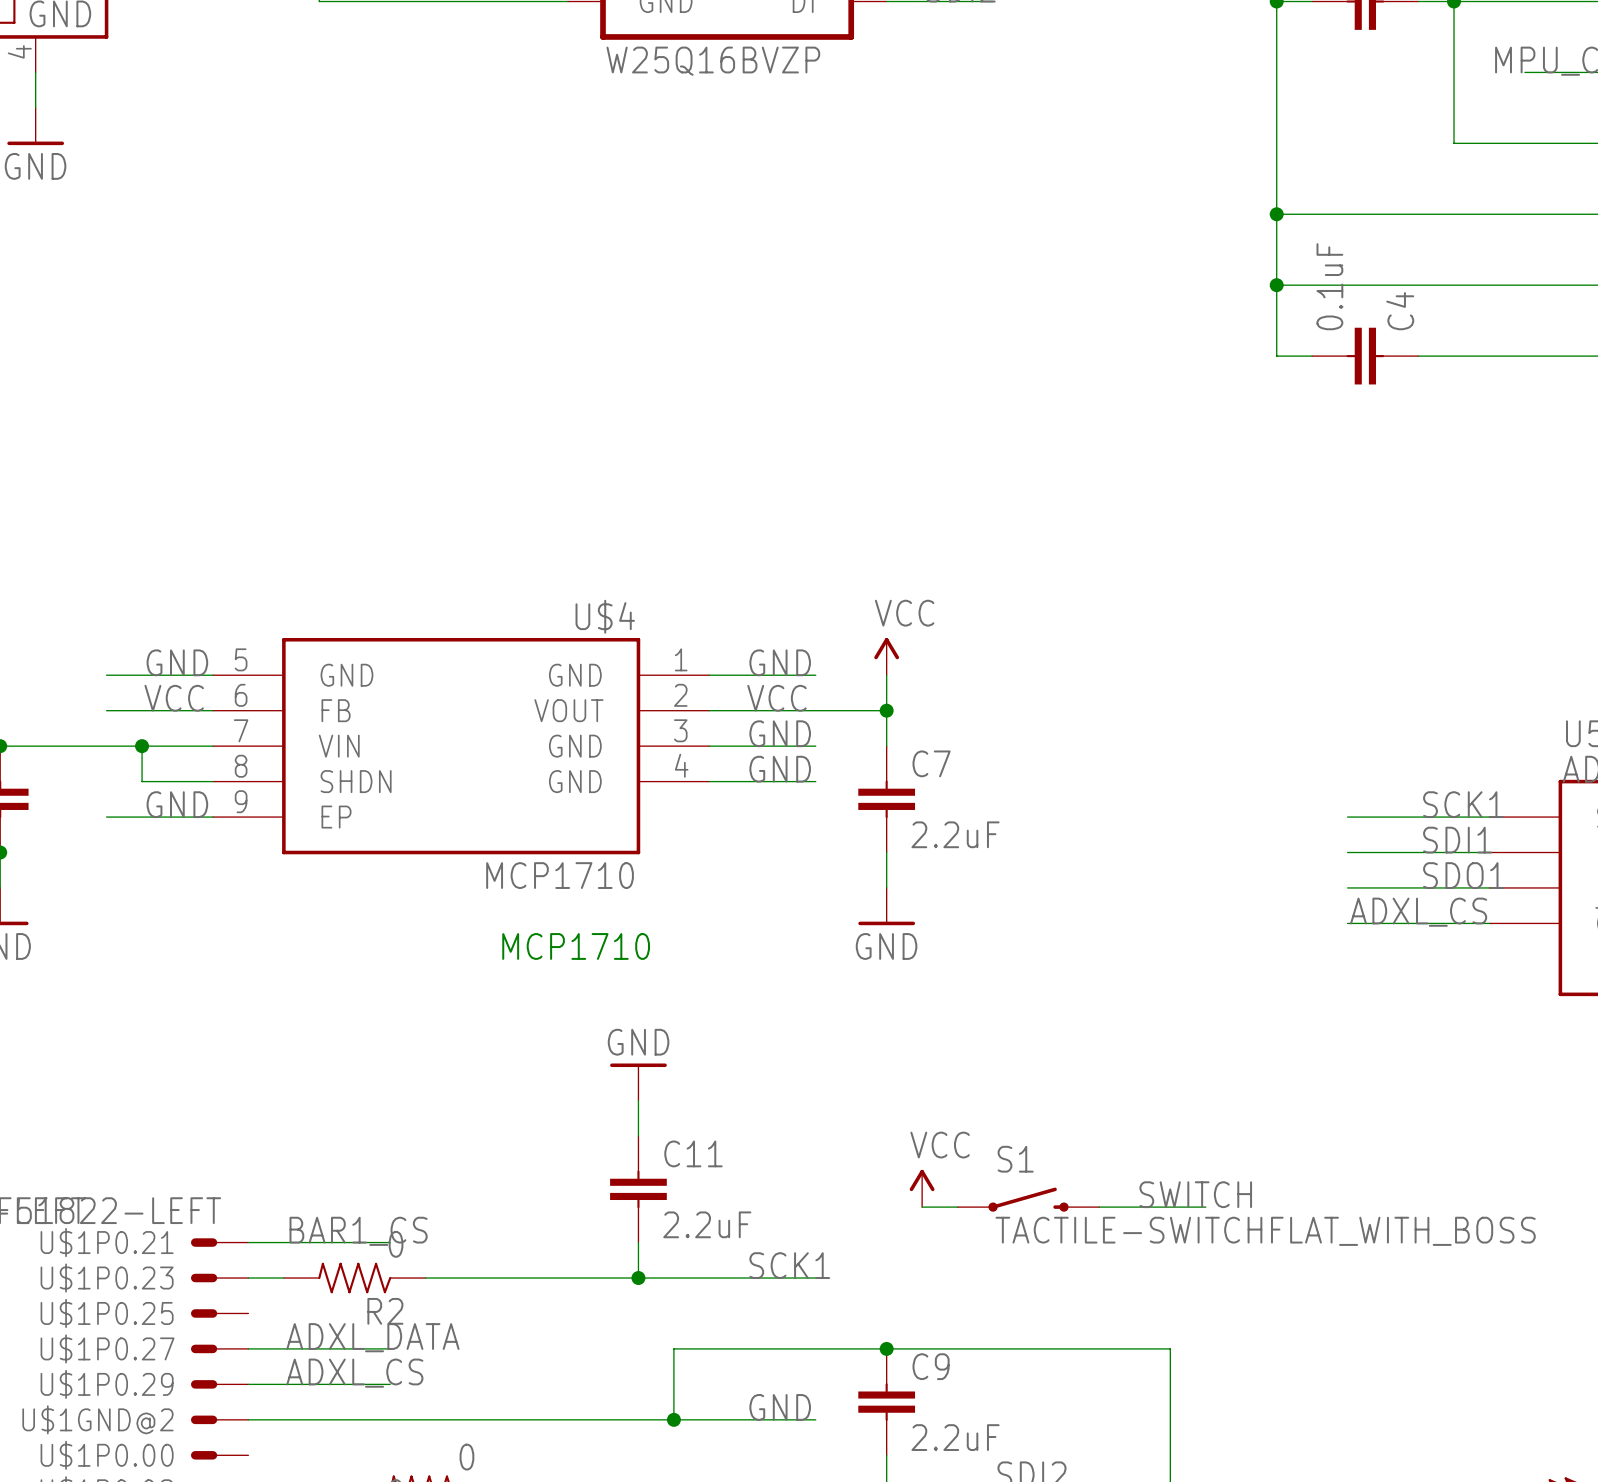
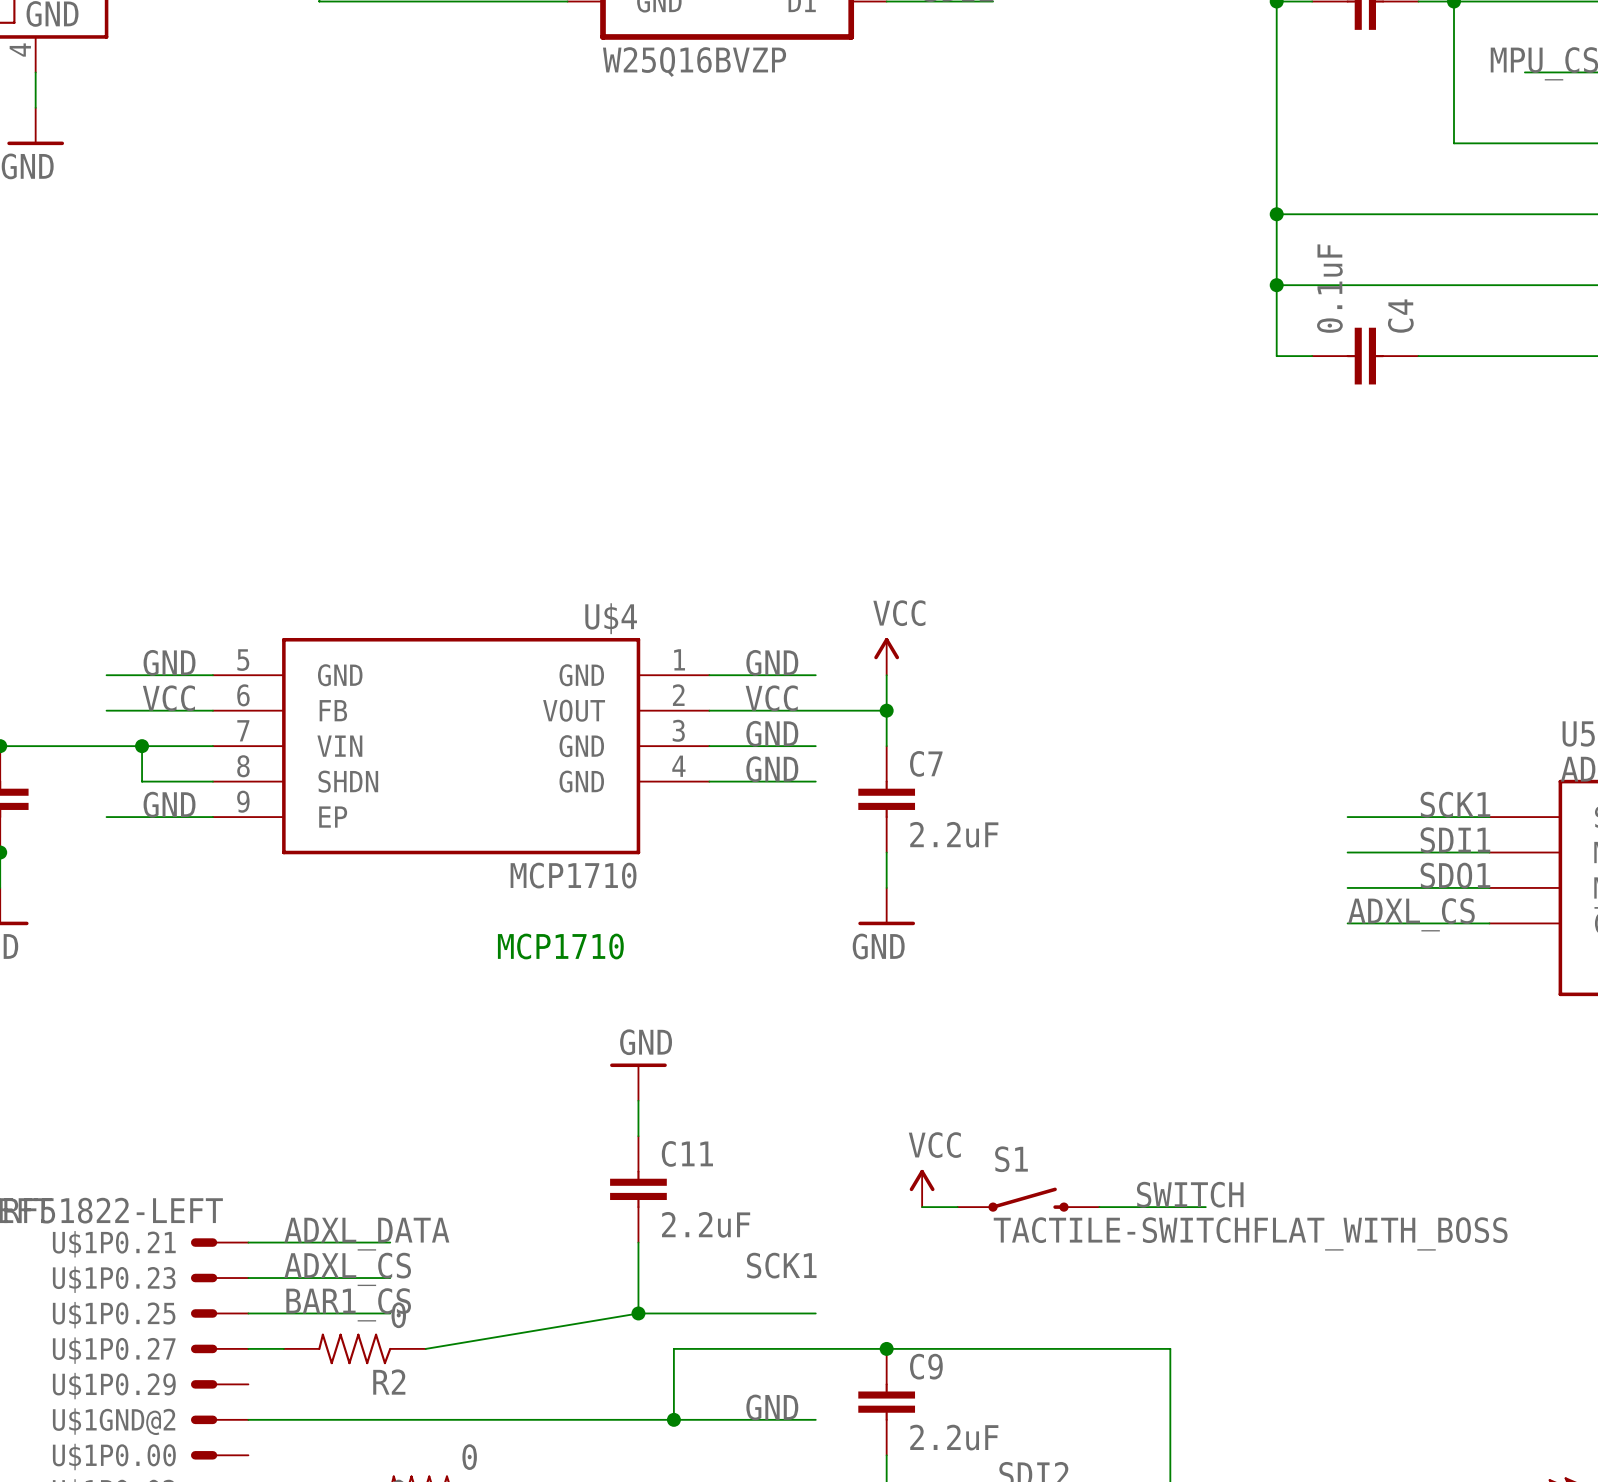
label: BAR1_CS (358, 1231) -> ADXL_DATA (366, 1234)
R2 position: (354, 1278) -> (354, 1348)
wire: (425, 1278) (815, 1278) -> none
wire: none -> (638, 1278) (638, 1313)
junction position: (638, 1278) -> (638, 1313)
label: none -> BAR1_CS (348, 1304)
wire: none -> (638, 1313) (815, 1313)
wire: none -> (638, 1313) (425, 1348)
label: ADXL_DATA (372, 1337) -> none
label position: ADXL_CS (354, 1373) -> ADXL_CS (347, 1269)
wire: (248, 1384) (390, 1384) -> (248, 1313) (390, 1313)

